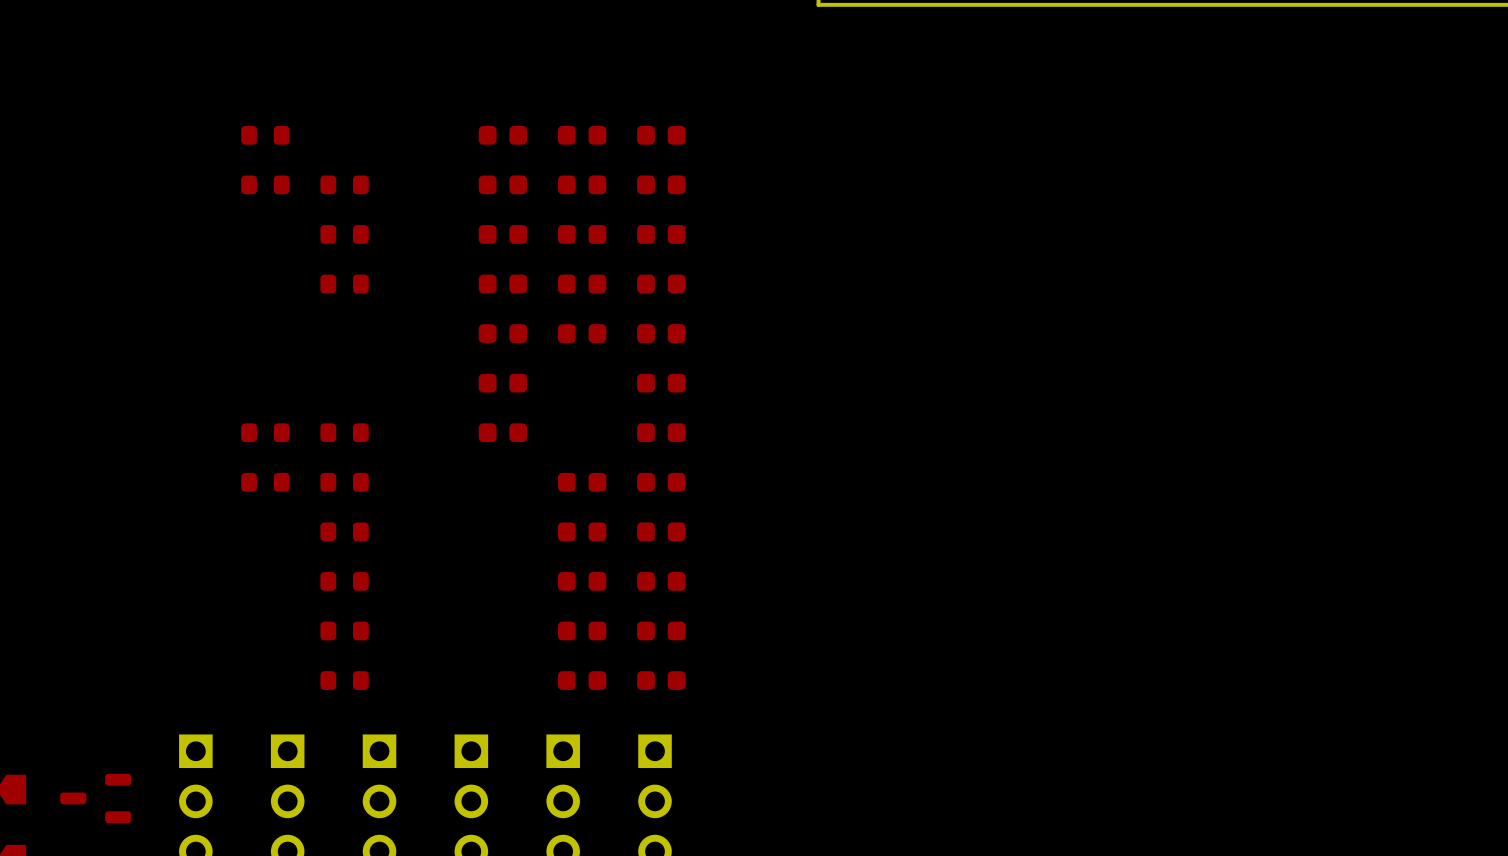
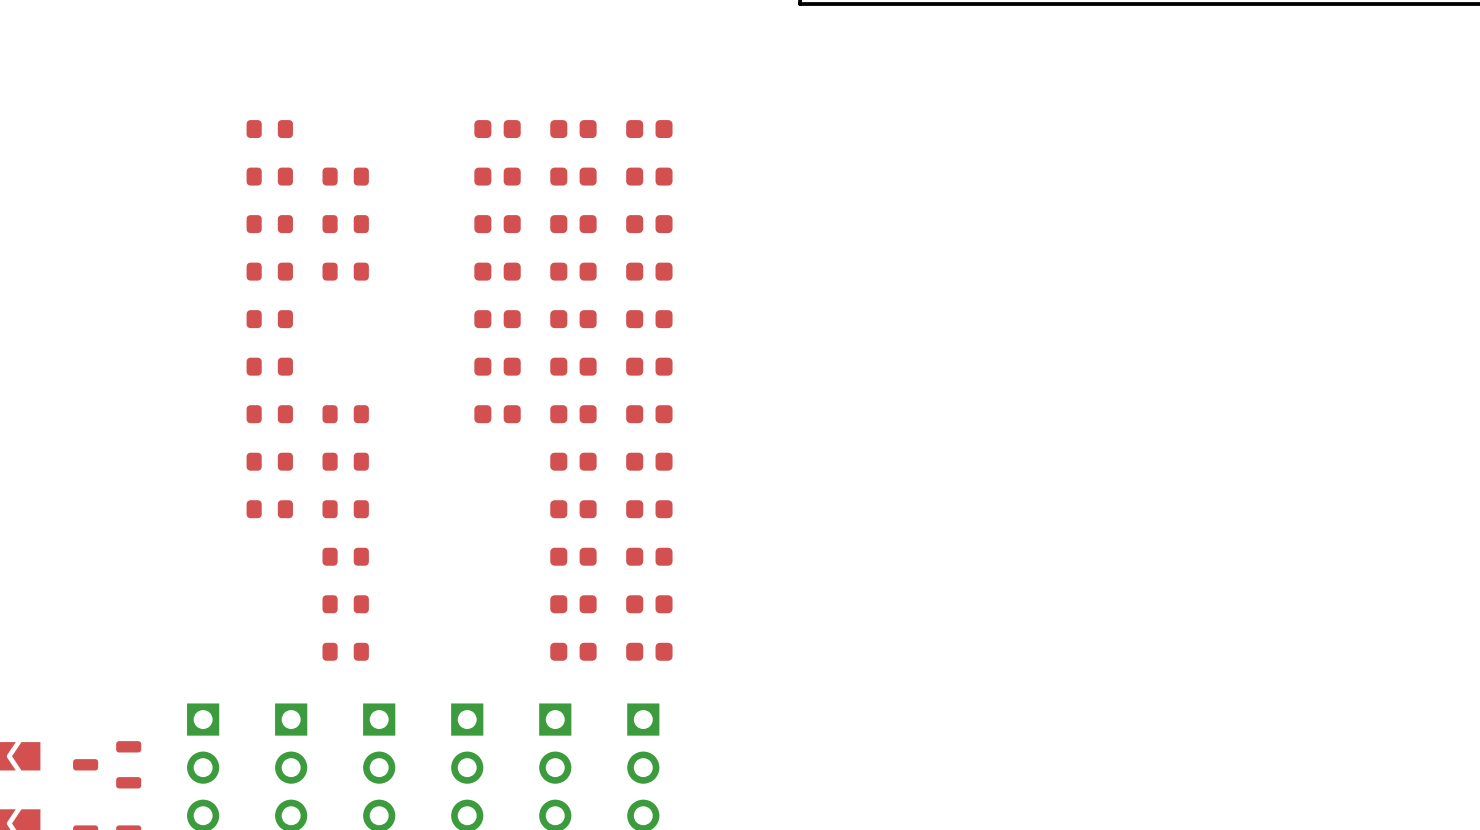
part: none -> (269, 224)
part: none -> (269, 271)
part: none -> (269, 319)
part: none -> (269, 366)
part: none -> (573, 366)
part: none -> (573, 414)
part: none -> (269, 509)

